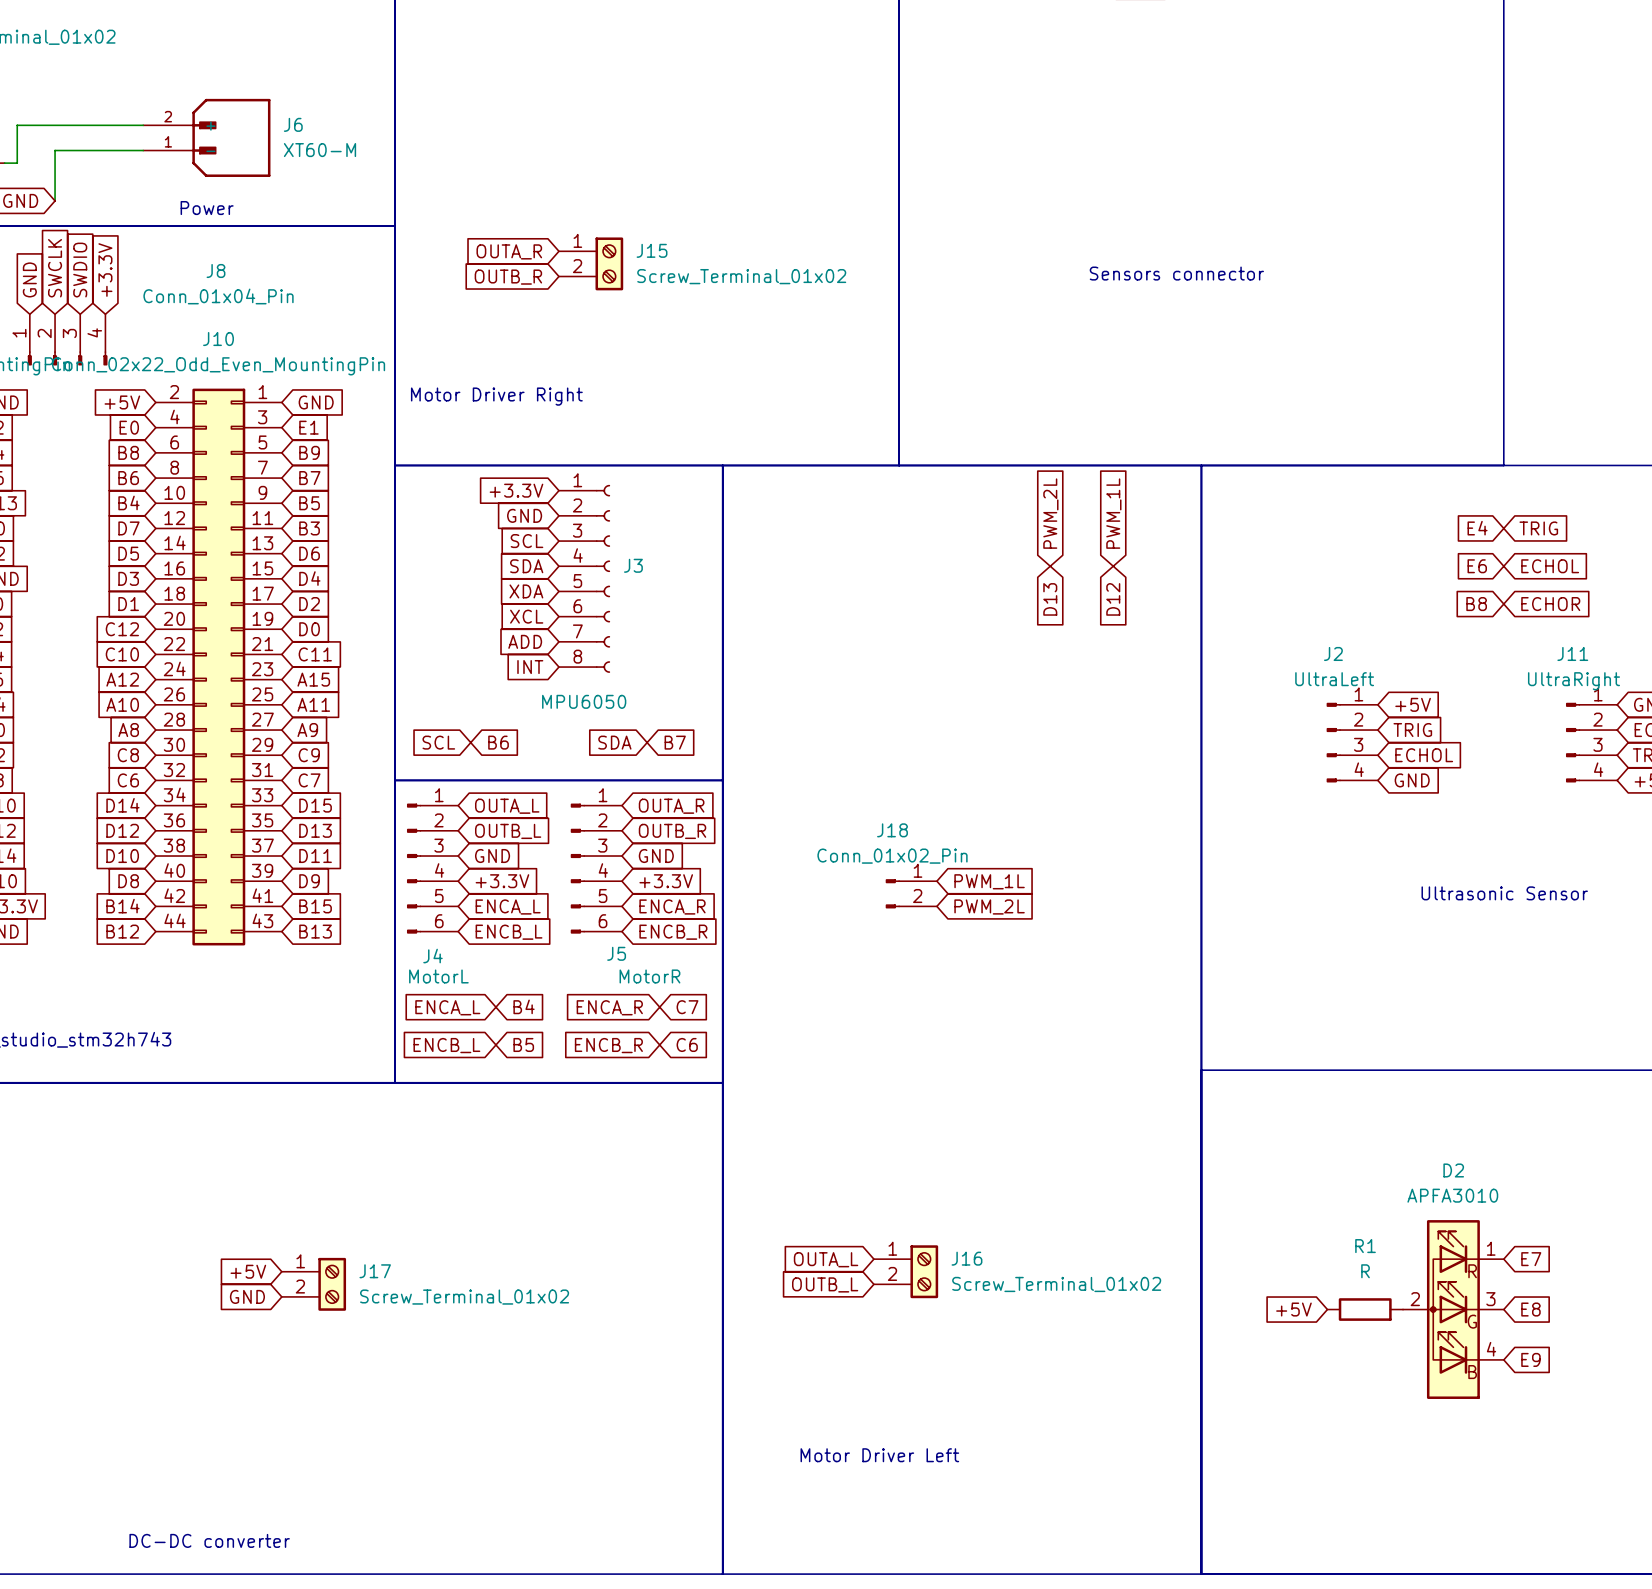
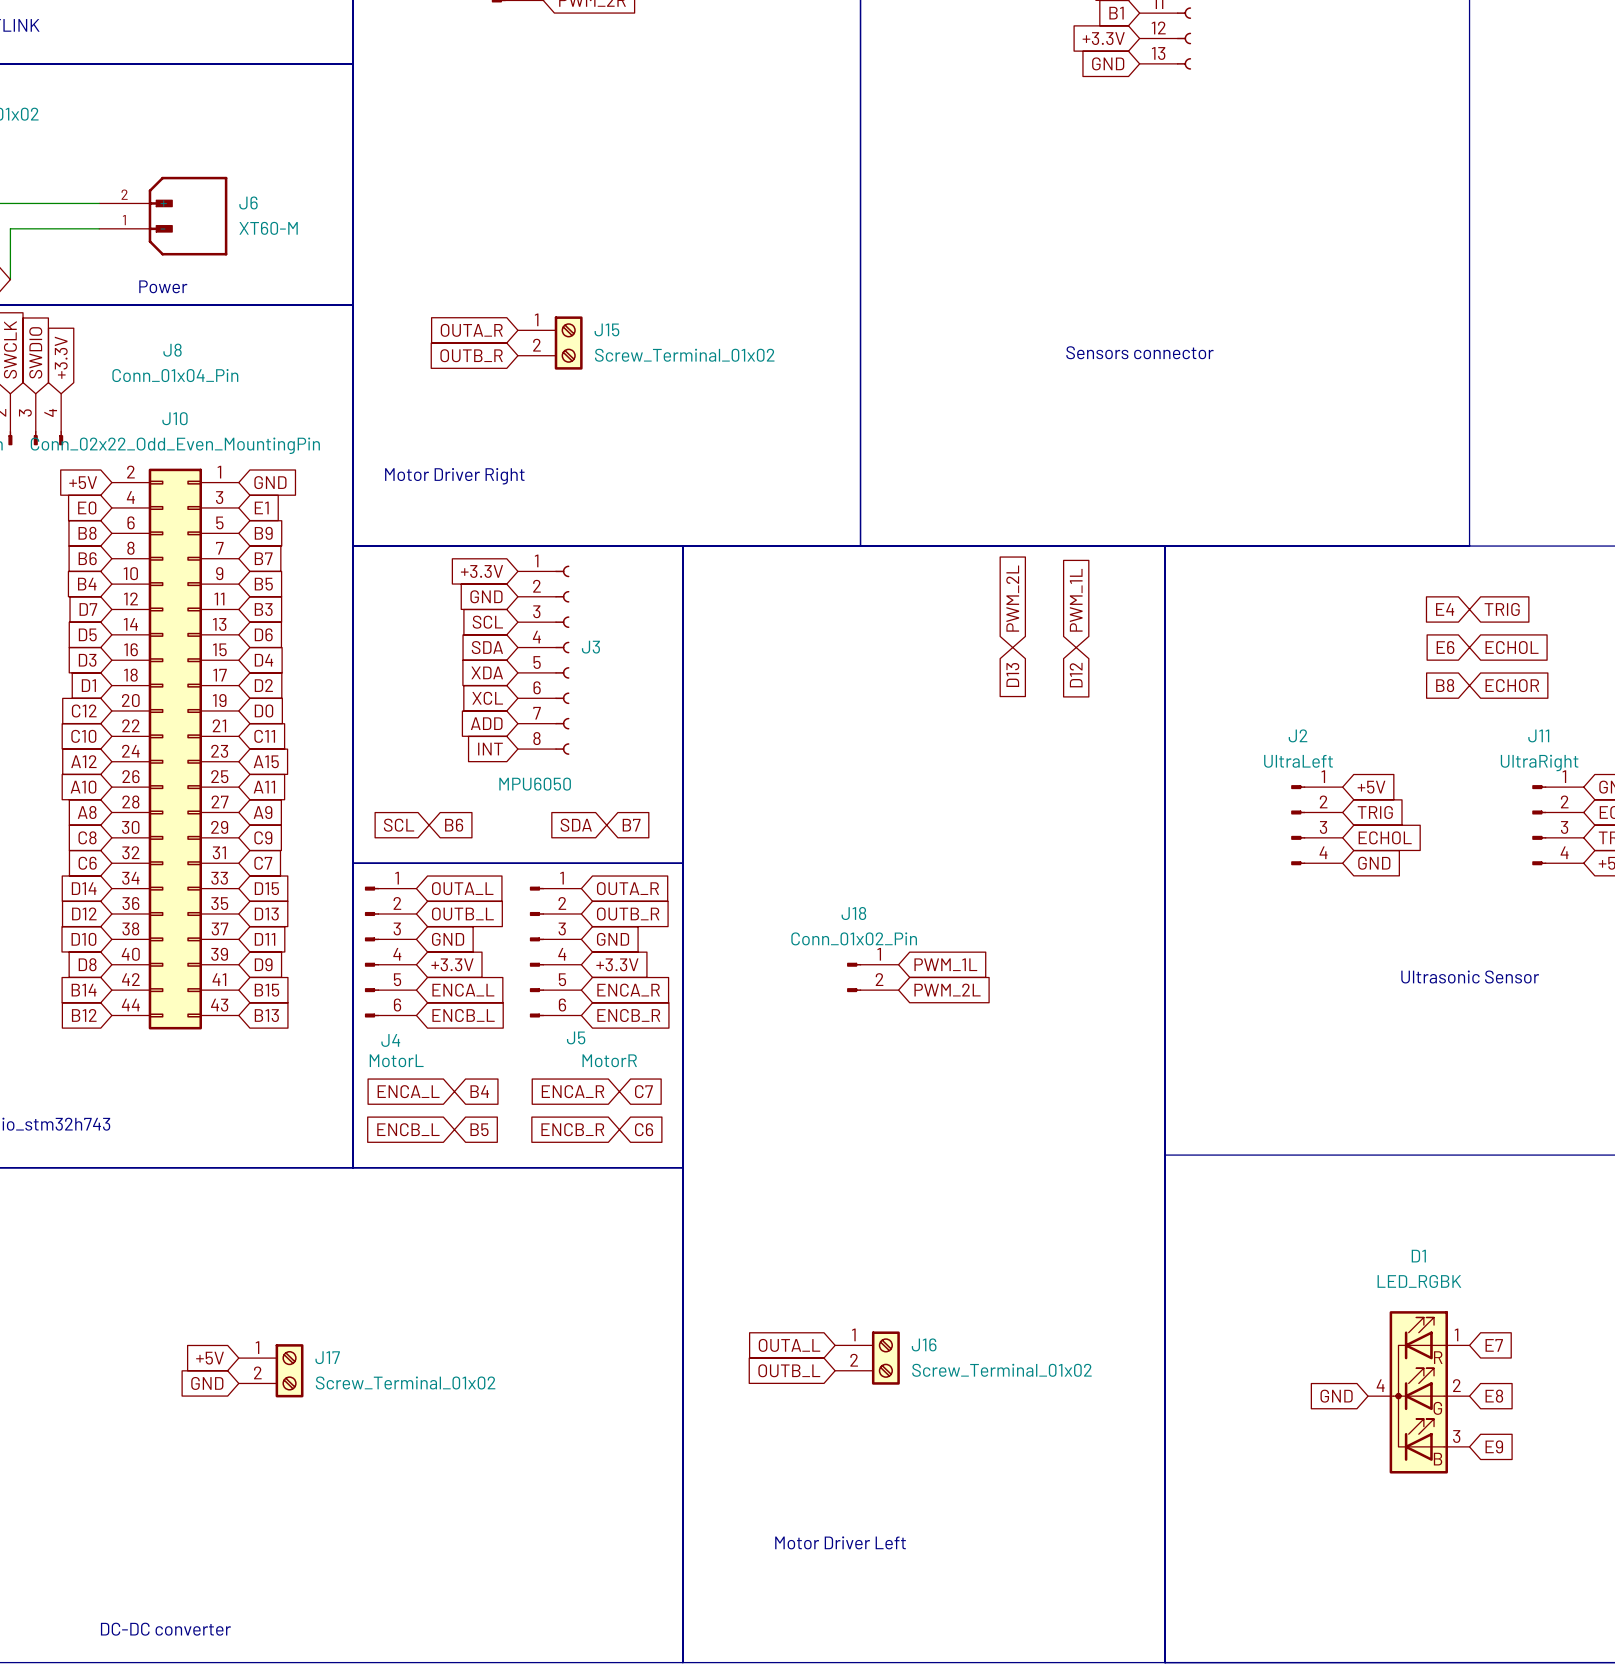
D1: none -> LED_RGBK (1418, 1392)
global label: +5V (1293, 1309) -> none
R1: R (1365, 1309) -> none
global label: none -> GND (1336, 1396)
D2: APFA3010 (1453, 1309) -> none

